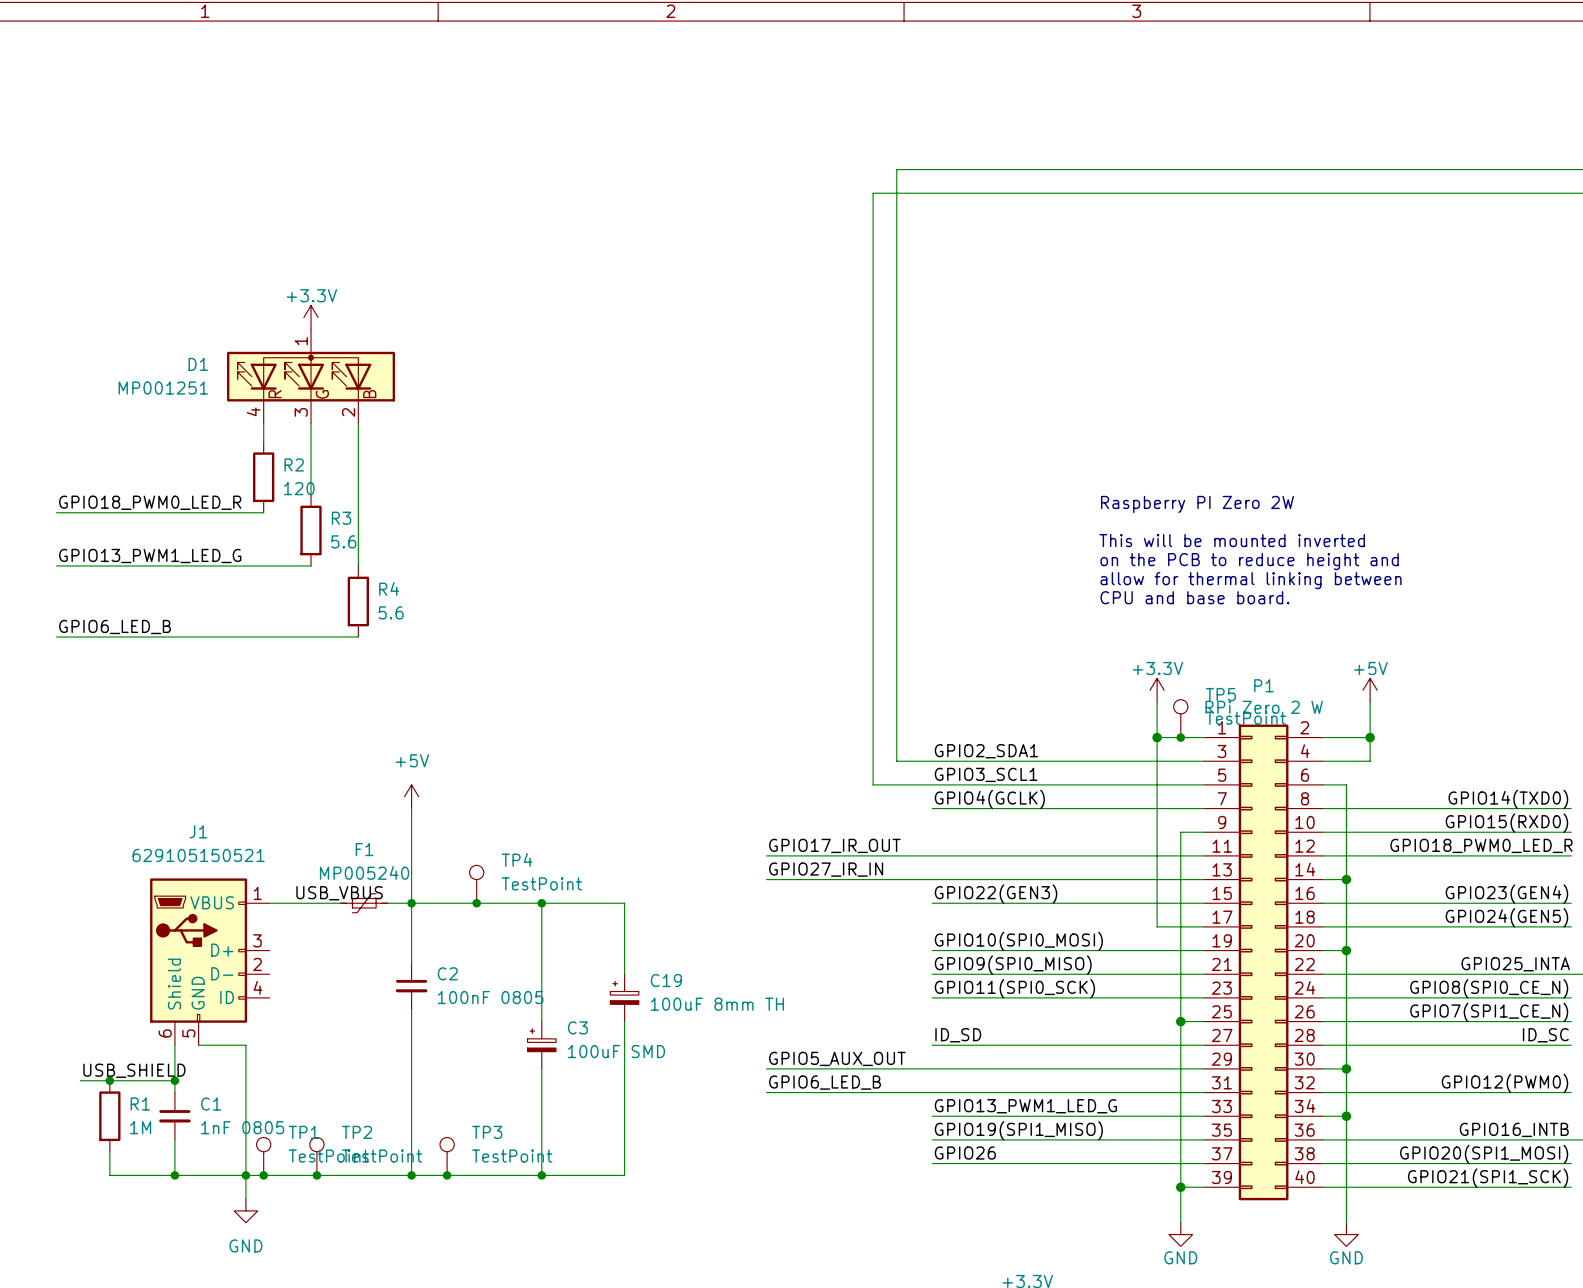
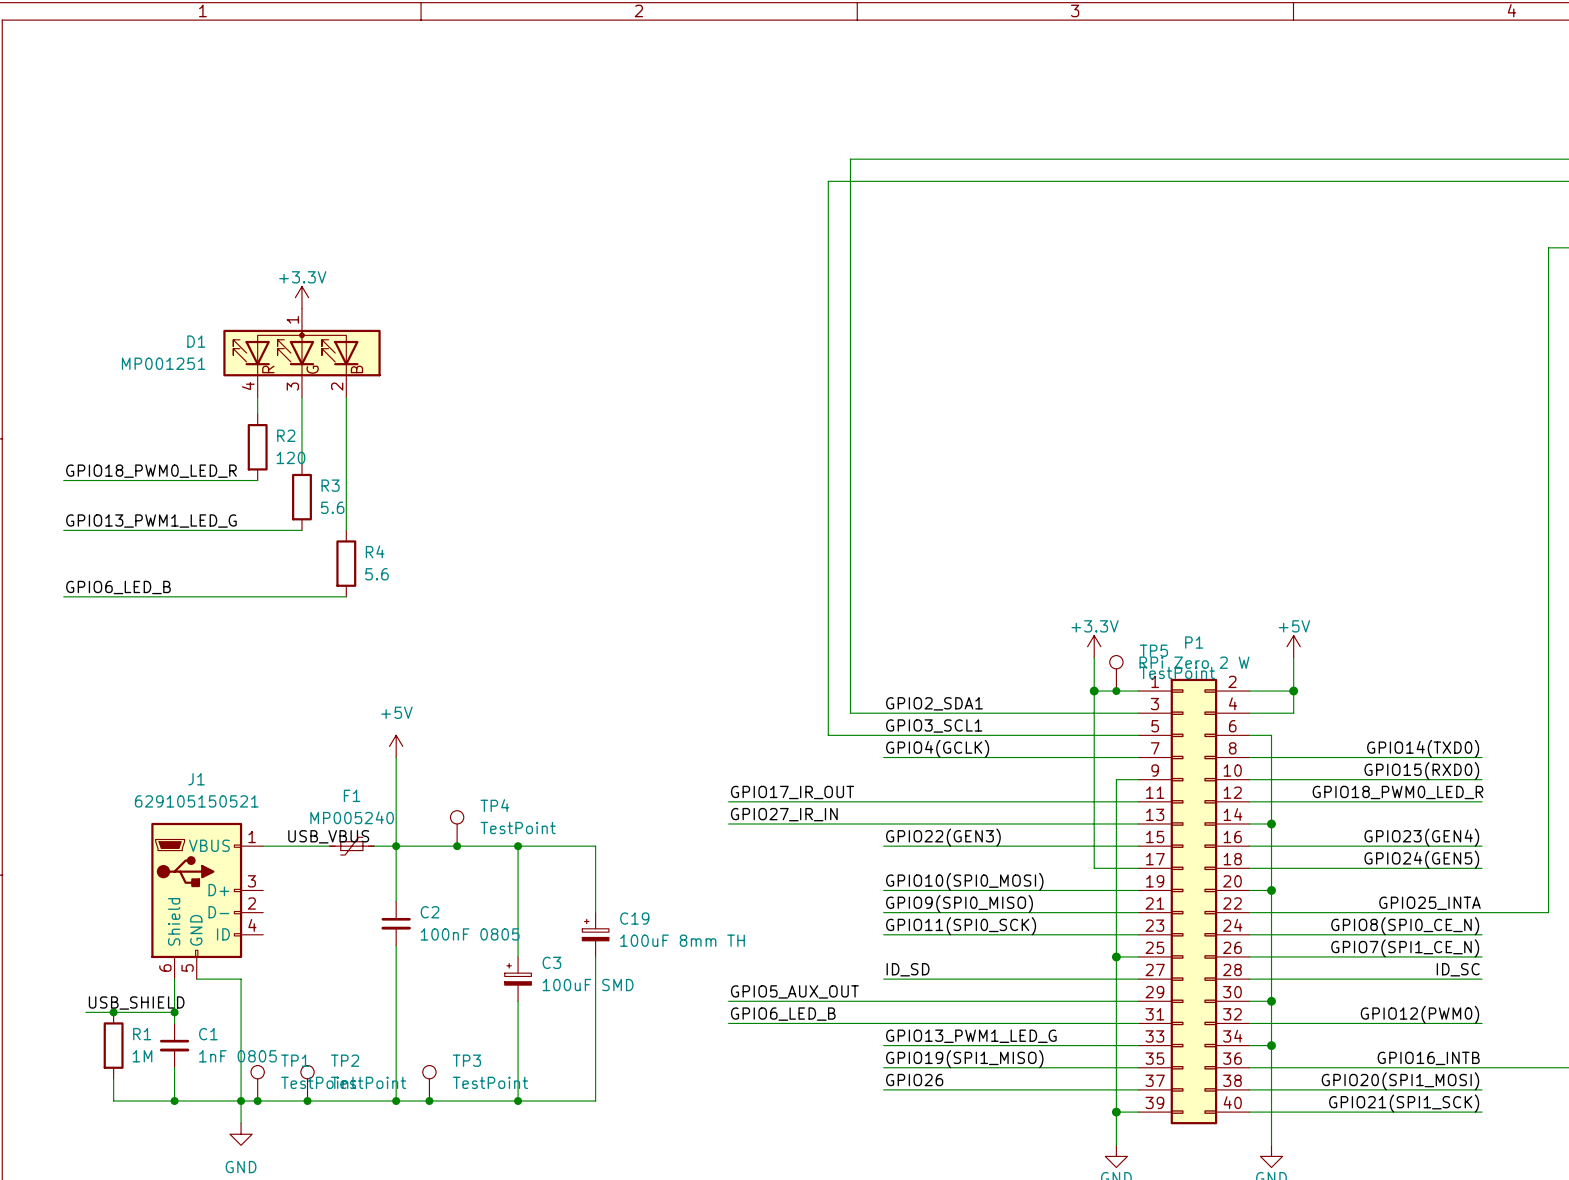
text: Raspberry PI Zero 2W (1197, 504) -> none
text: This will be mounted inverted (1232, 540) -> none
text: on the PCB to reduce height and (1249, 561) -> none
text: allow for thermal linking between (1251, 580) -> none
text: CPU and base board. (1194, 597) -> none

